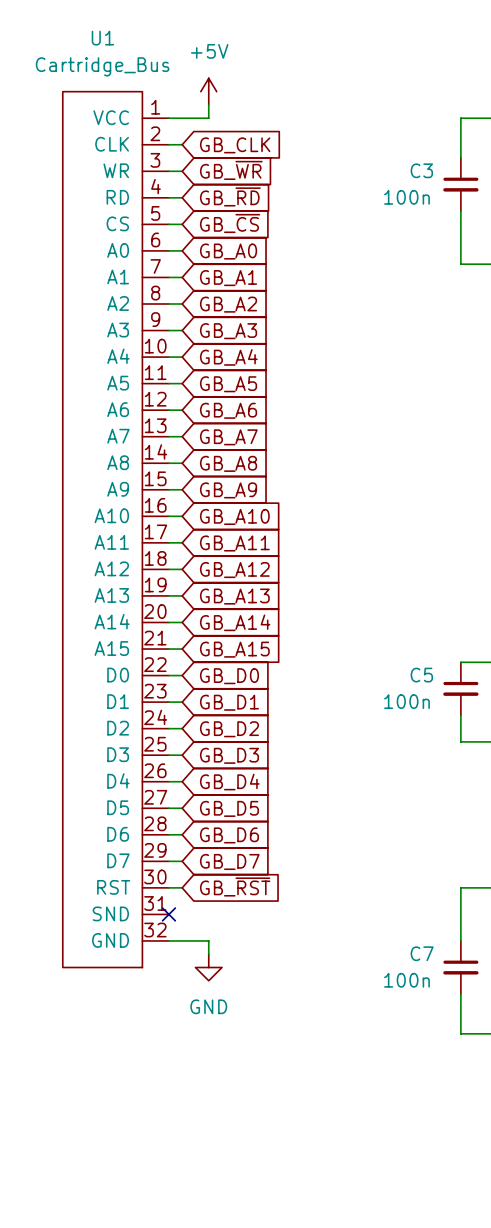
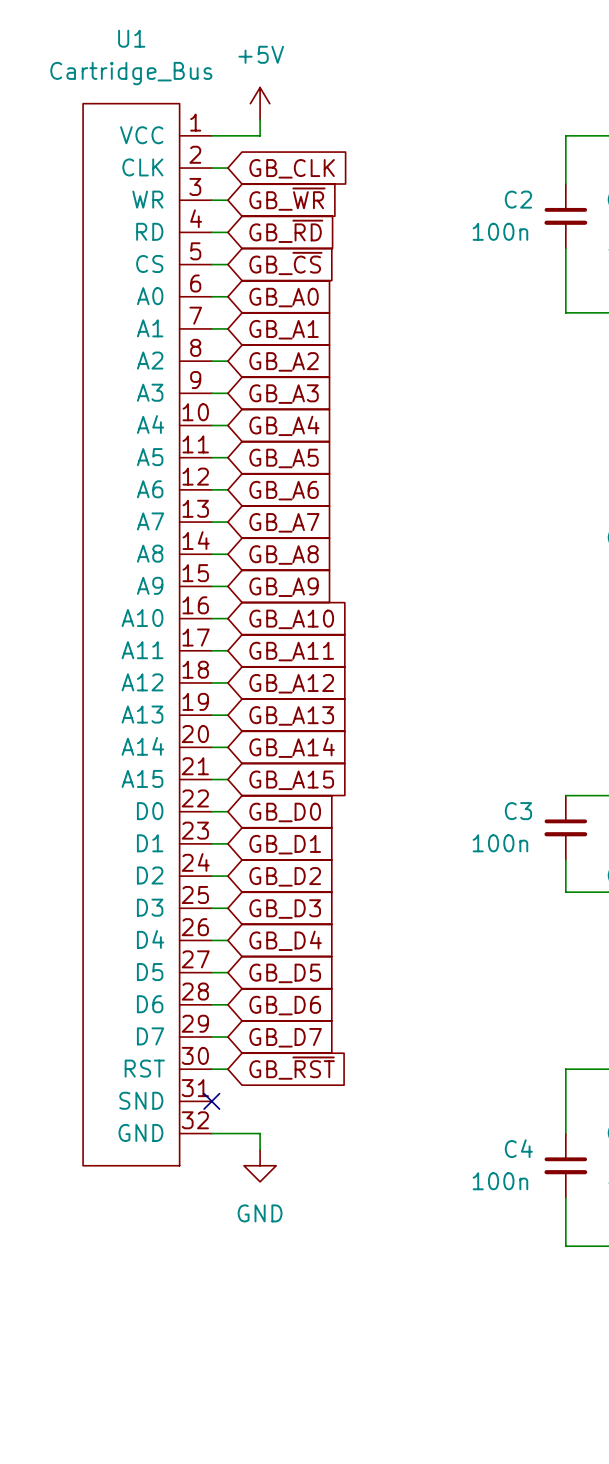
C3 name: C3 (421, 170) -> C2 (518, 199)
C5 name: C5 (421, 675) -> C3 (518, 811)
C7 name: C7 (422, 953) -> C4 (518, 1148)

